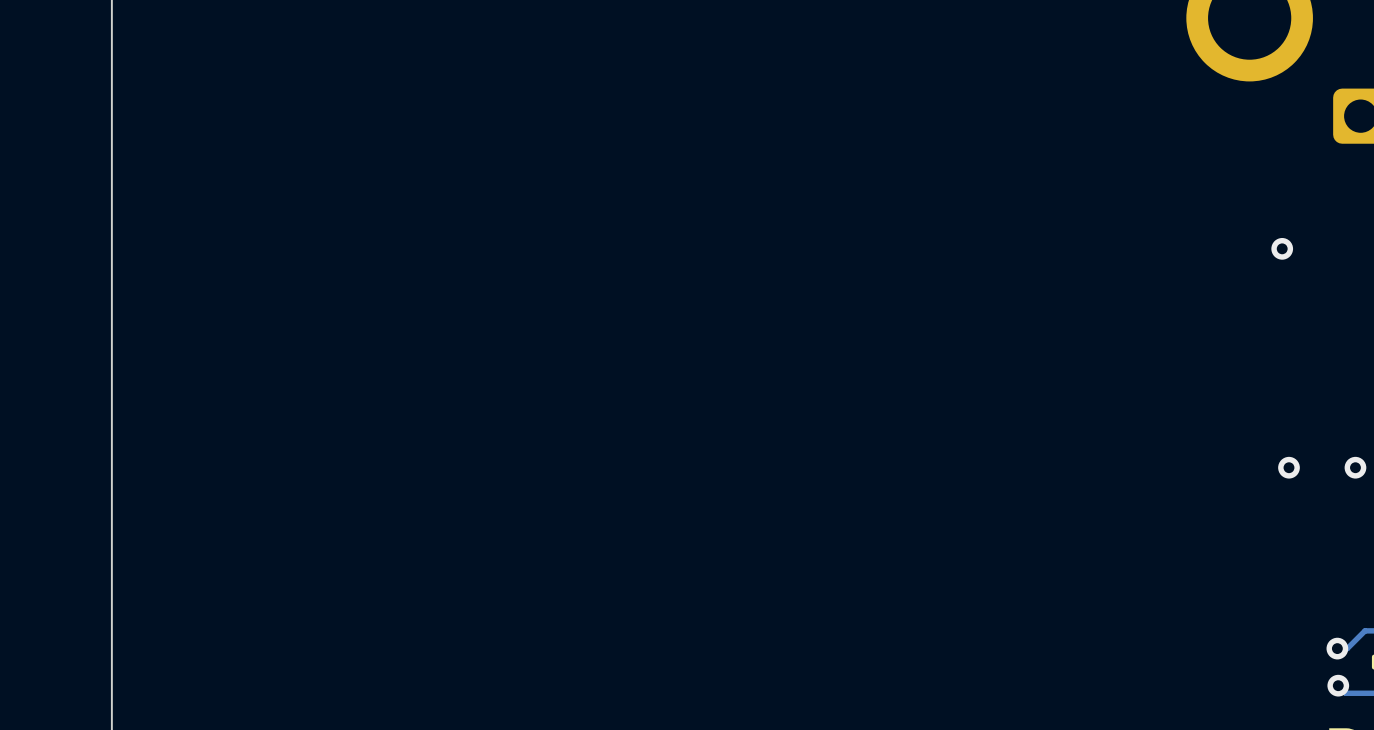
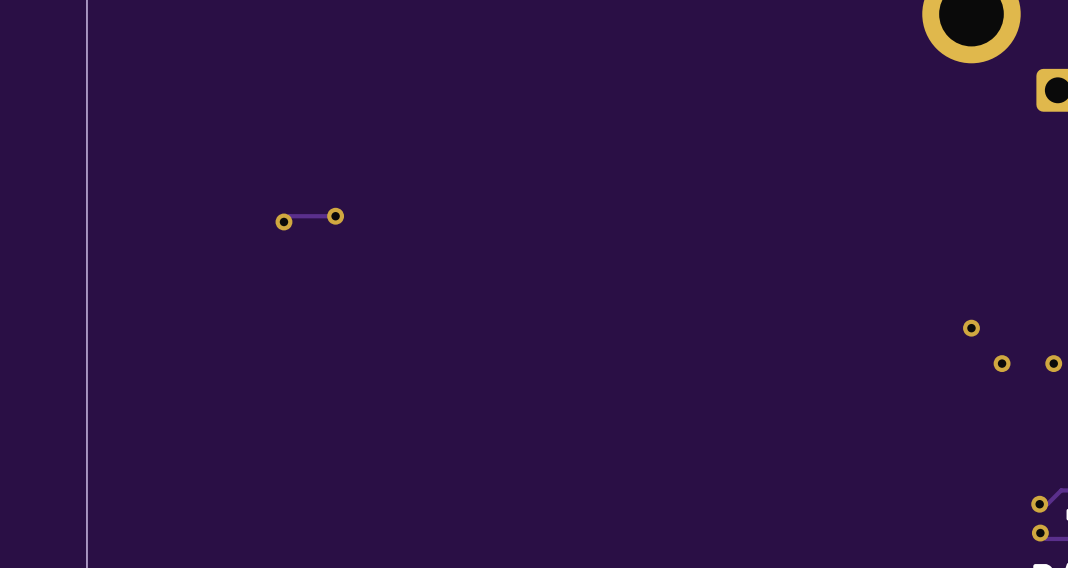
via: (1282, 248) -> none
track: none -> (335, 216) (289, 216) (283, 221)
via: none -> (335, 216)
via: none -> (283, 221)
via: none -> (971, 328)

